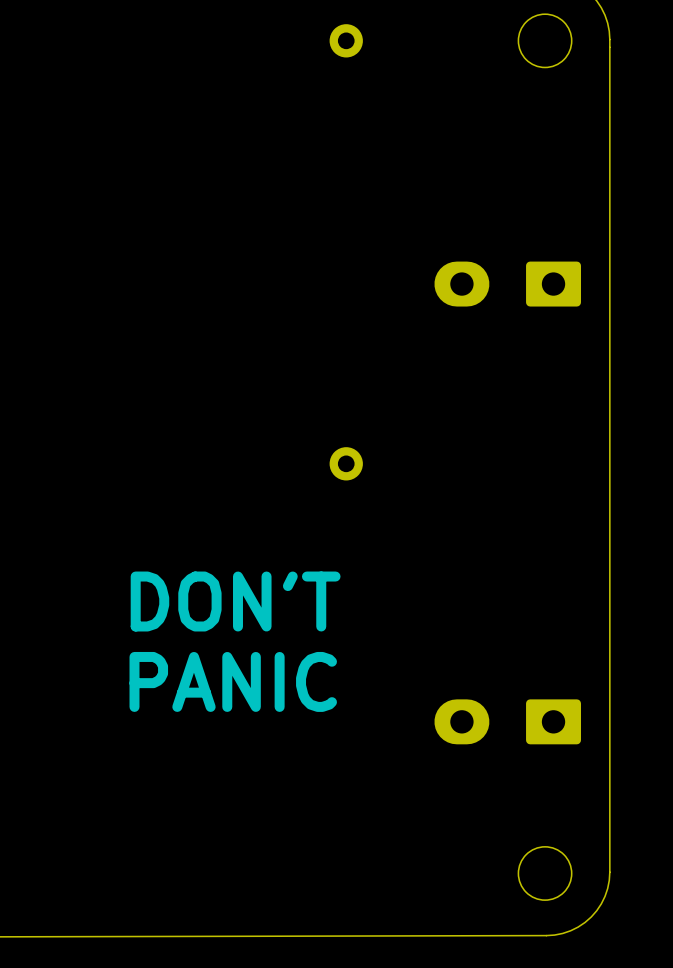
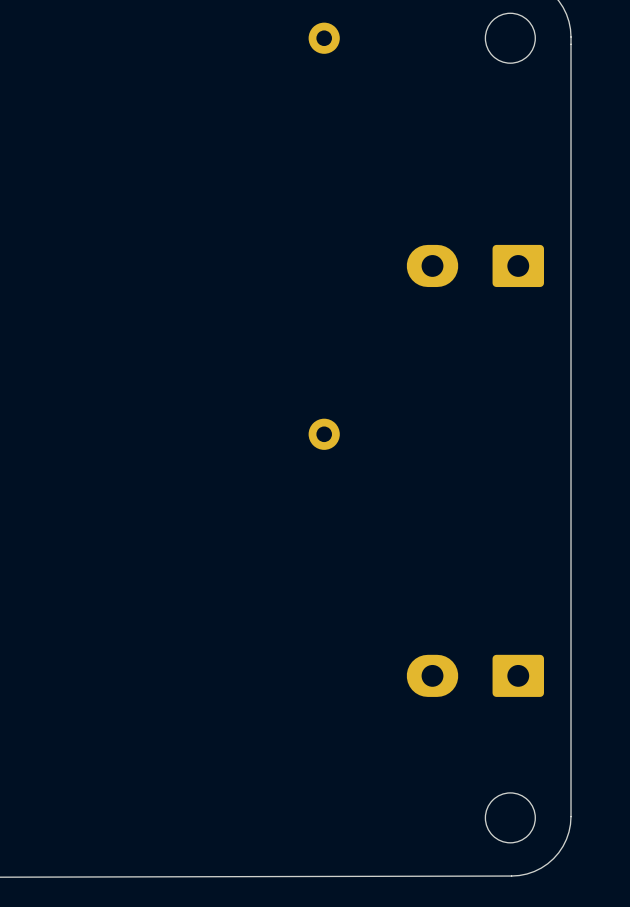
text: DON'T (235, 601) -> none
text: PANIC (233, 681) -> none

